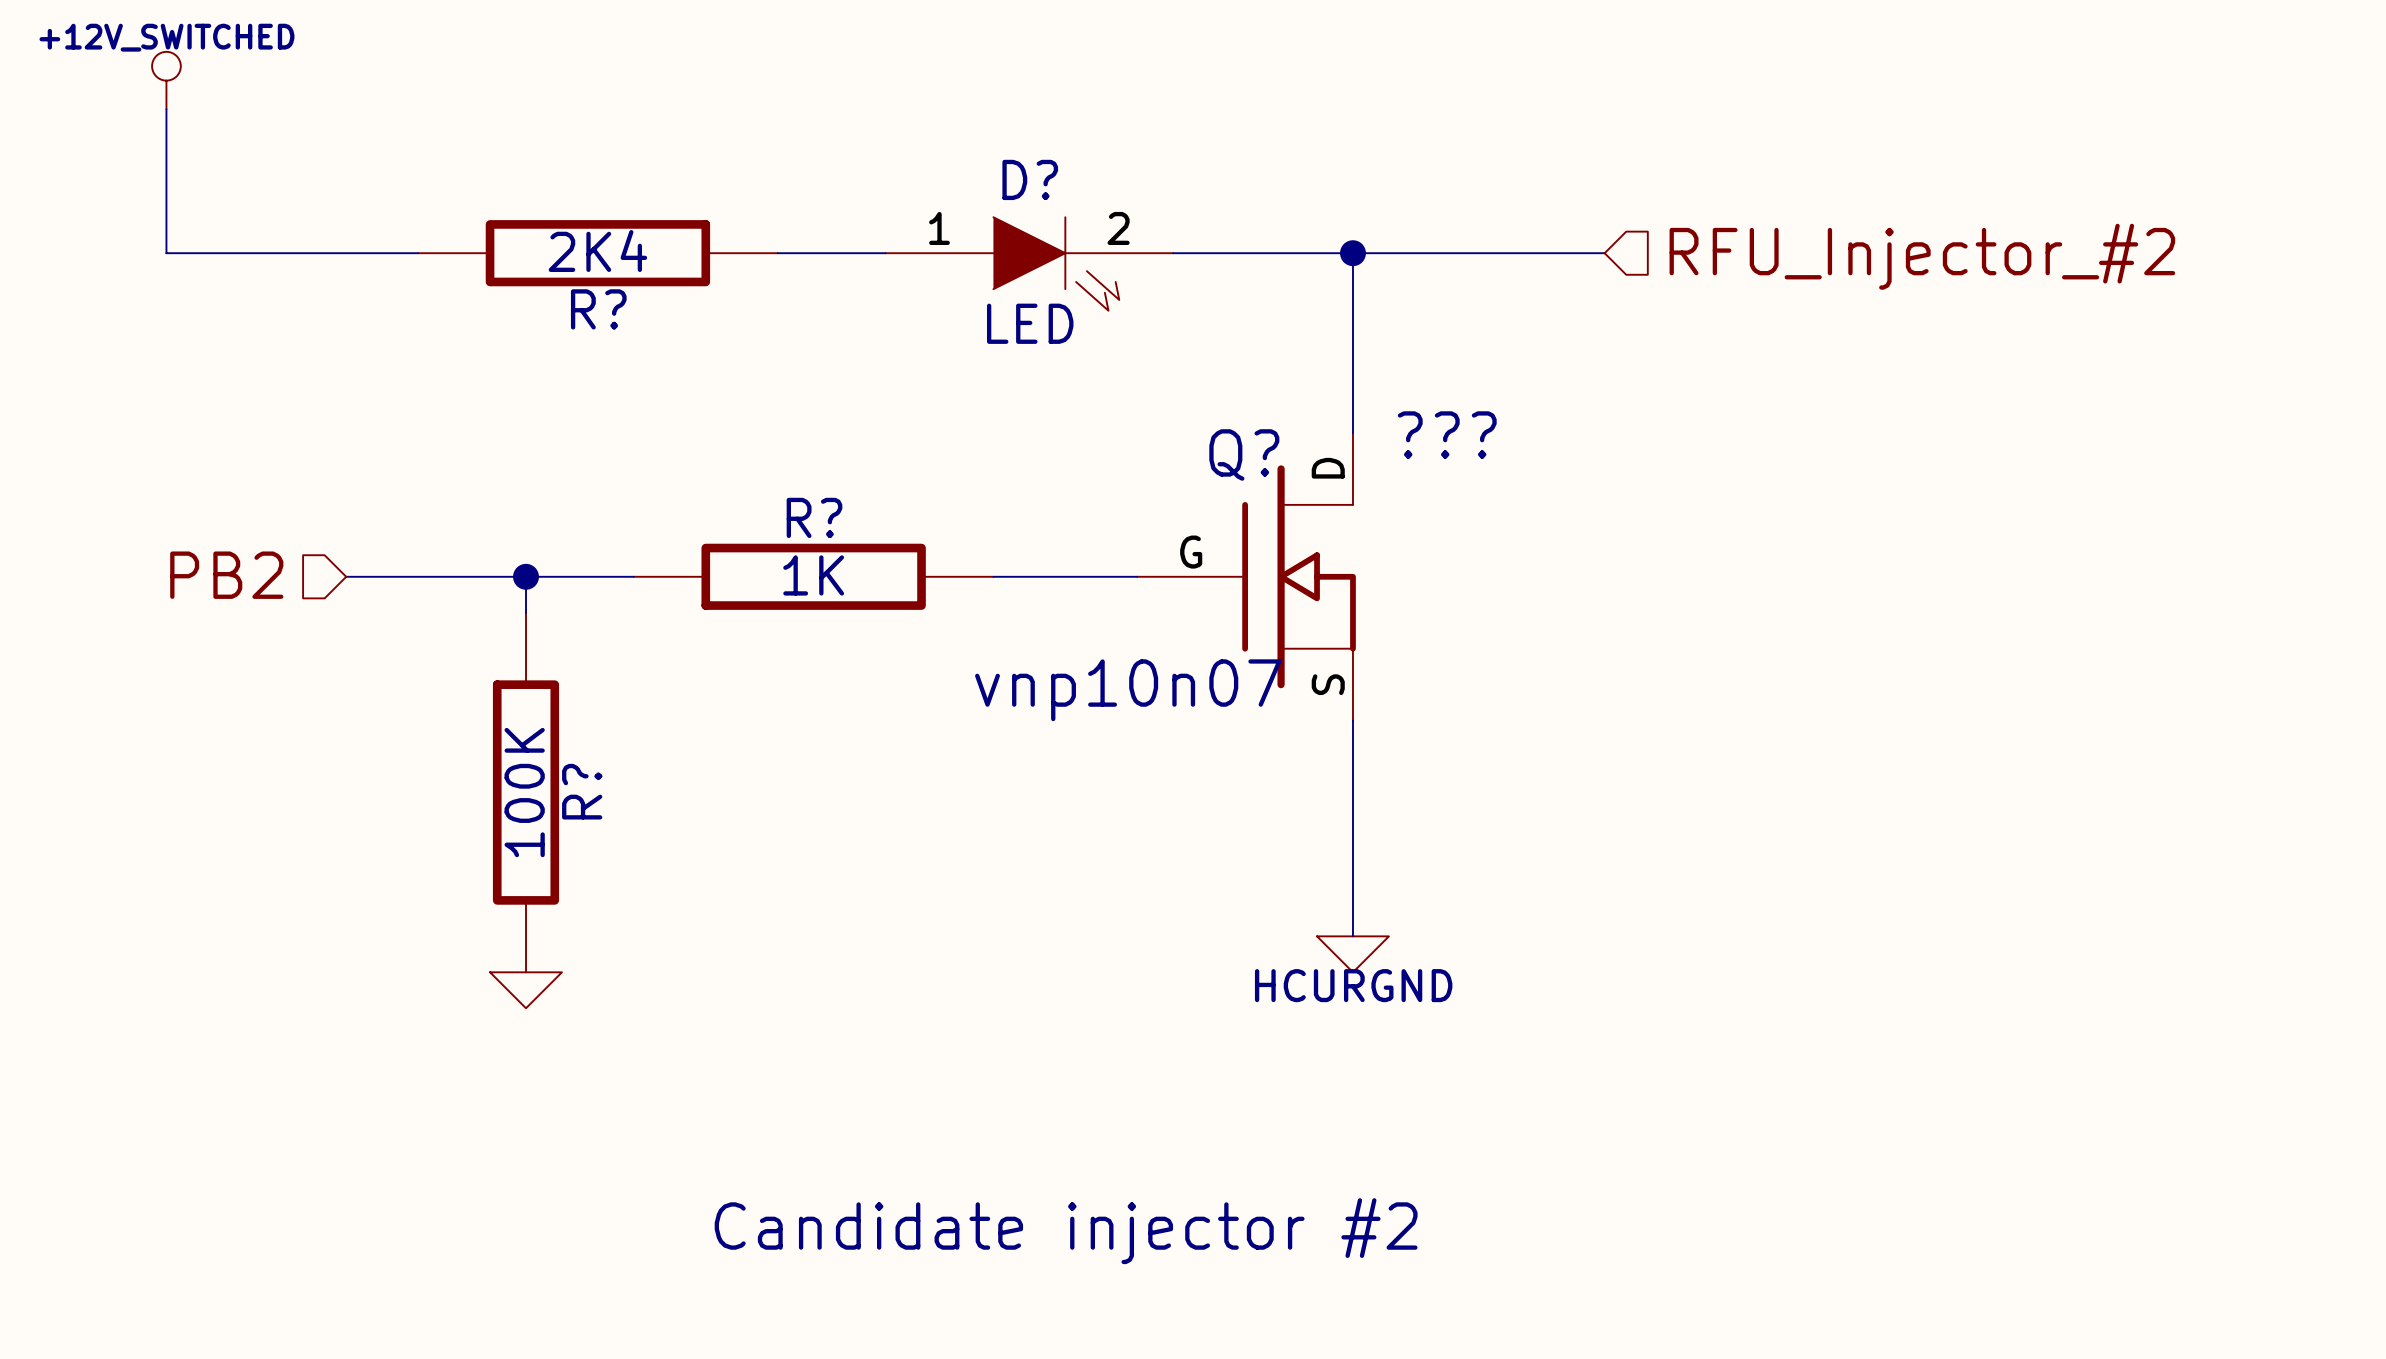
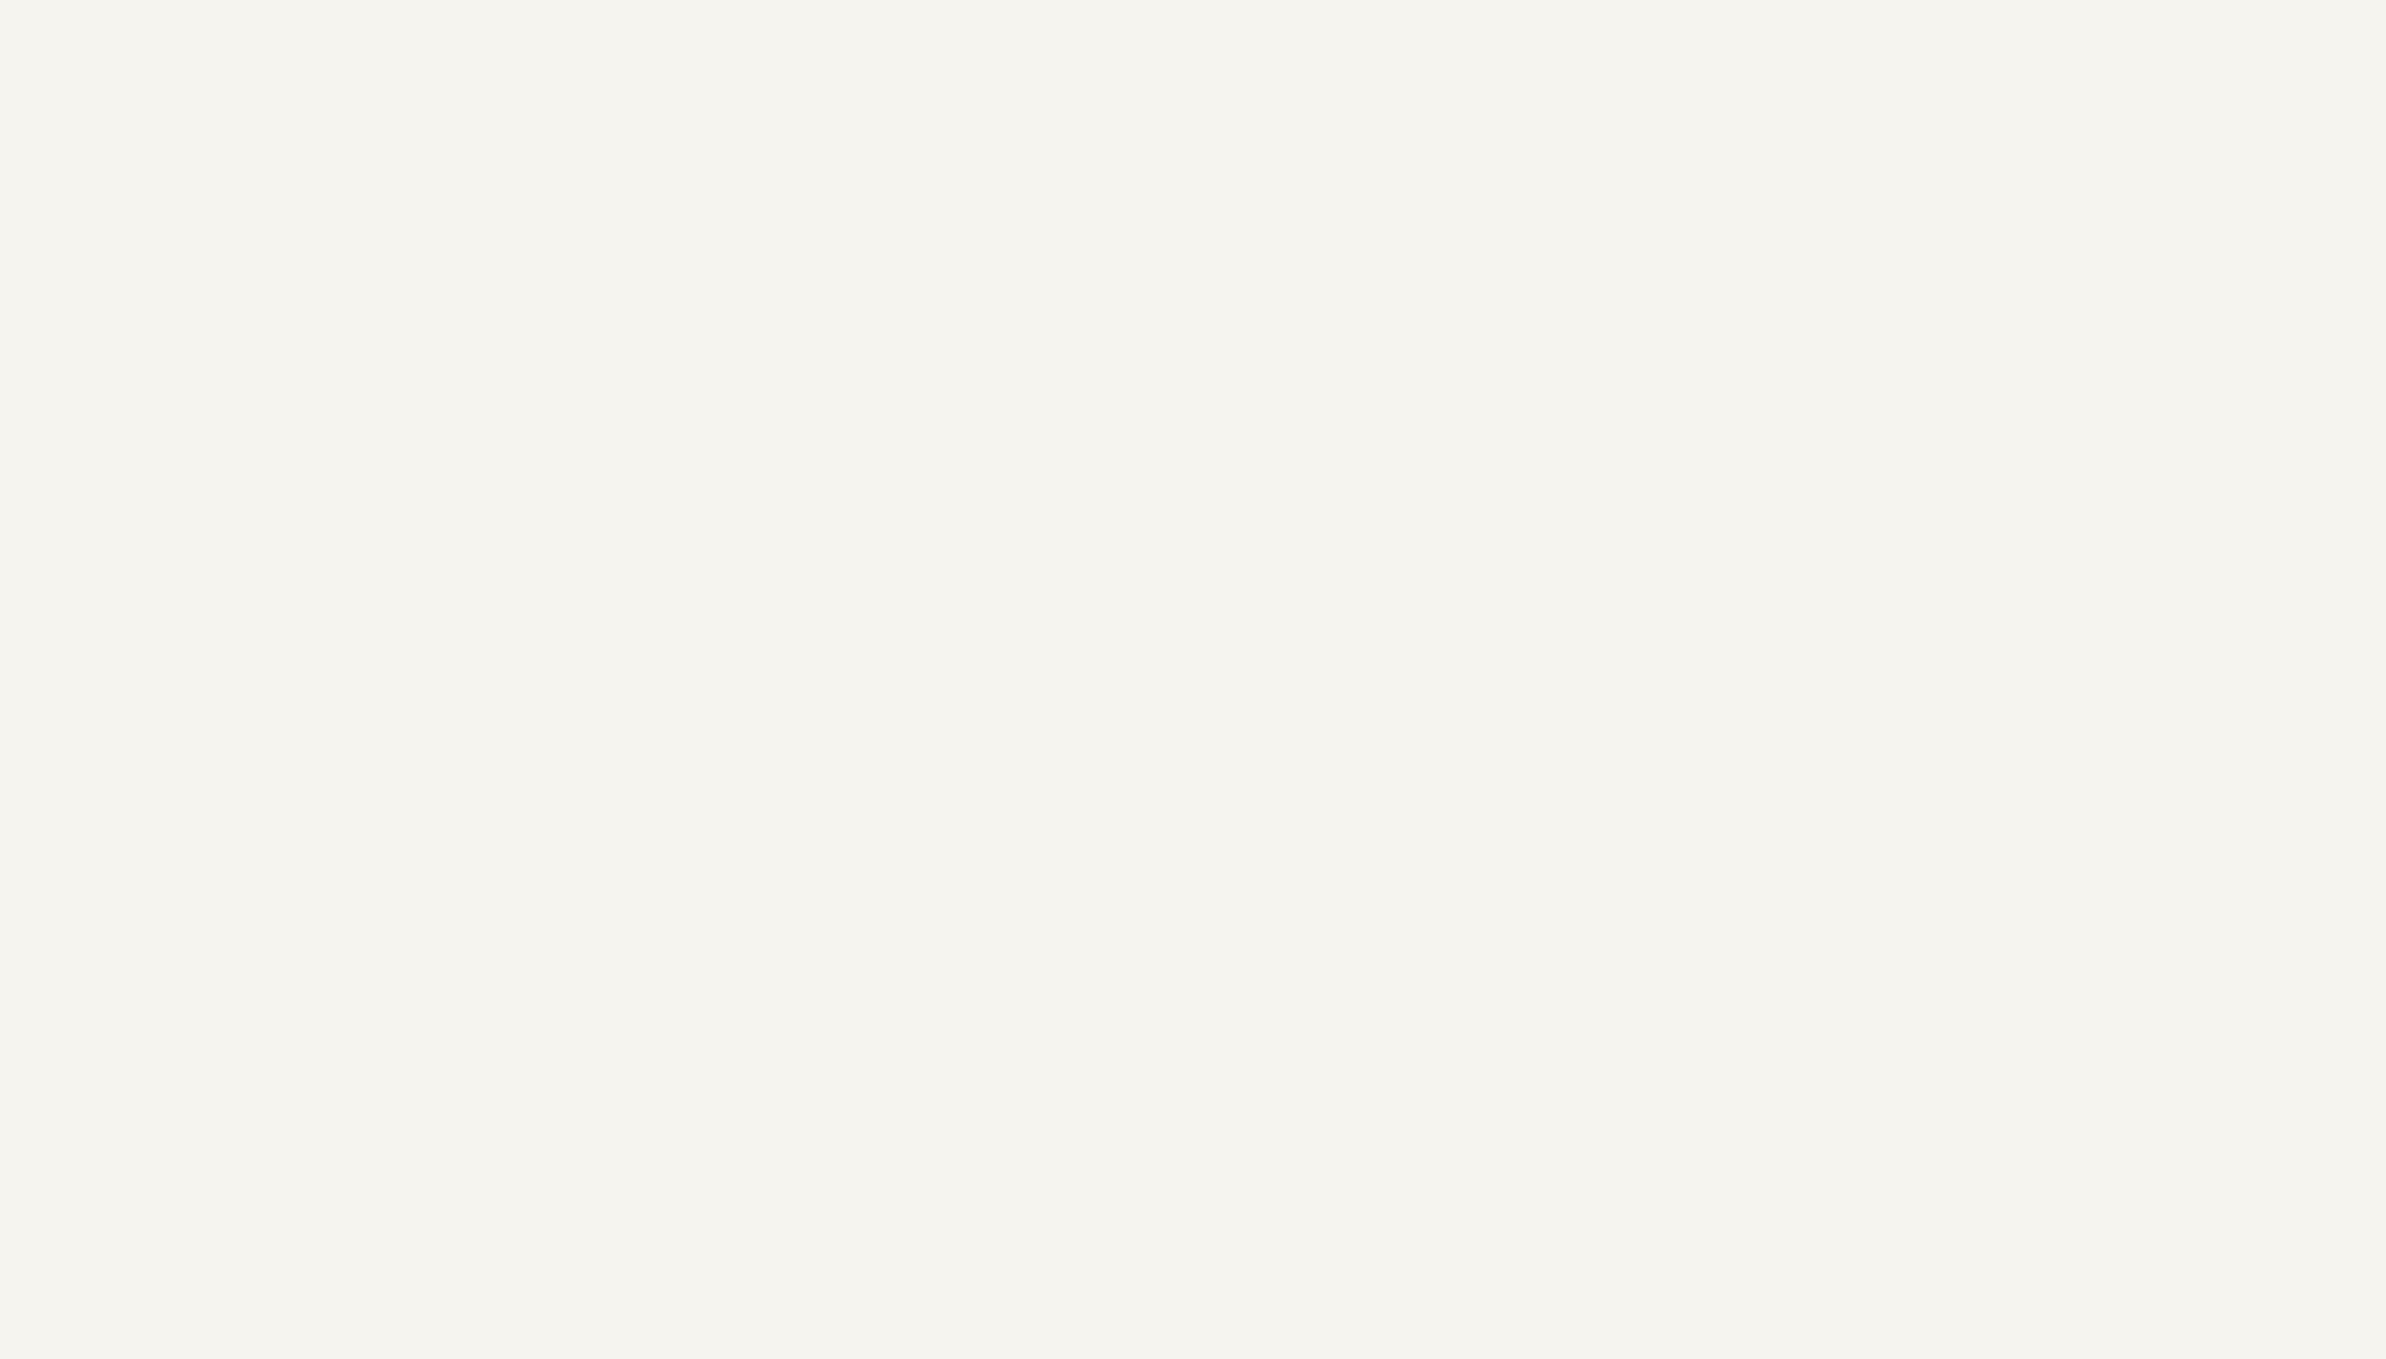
power symbol: +12V_SWITCHED (166, 80) -> none
wire: (166, 109) (166, 253) (418, 253) -> none
R?: 2K4 (597, 253) -> none
wire: (777, 253) (885, 253) -> none
wire: (1173, 253) (1604, 253) -> none
wire: (1352, 253) (1352, 432) -> none
junction: (1352, 253) -> none
hierarchical label: RFU_Injector_#2 (1922, 256) -> none
D?: LED (1029, 263) -> none
text: ??? (1447, 435) -> none
hierarchical label: PB2 (226, 575) -> none
wire: (346, 576) (633, 576) -> none
wire: (526, 576) (526, 612) -> none
junction: (526, 576) -> none
R?: 1K (813, 576) -> none
wire: (993, 576) (1137, 576) -> none
Q?: vnp10n07 (1246, 576) -> none
wire: (1352, 720) (1352, 936) -> none
R?: 100K (526, 792) -> none
power symbol: HCURGND (1352, 954) -> none
power symbol: (526, 990) -> none
text: Candidate injector #2 (1066, 1231) -> none

